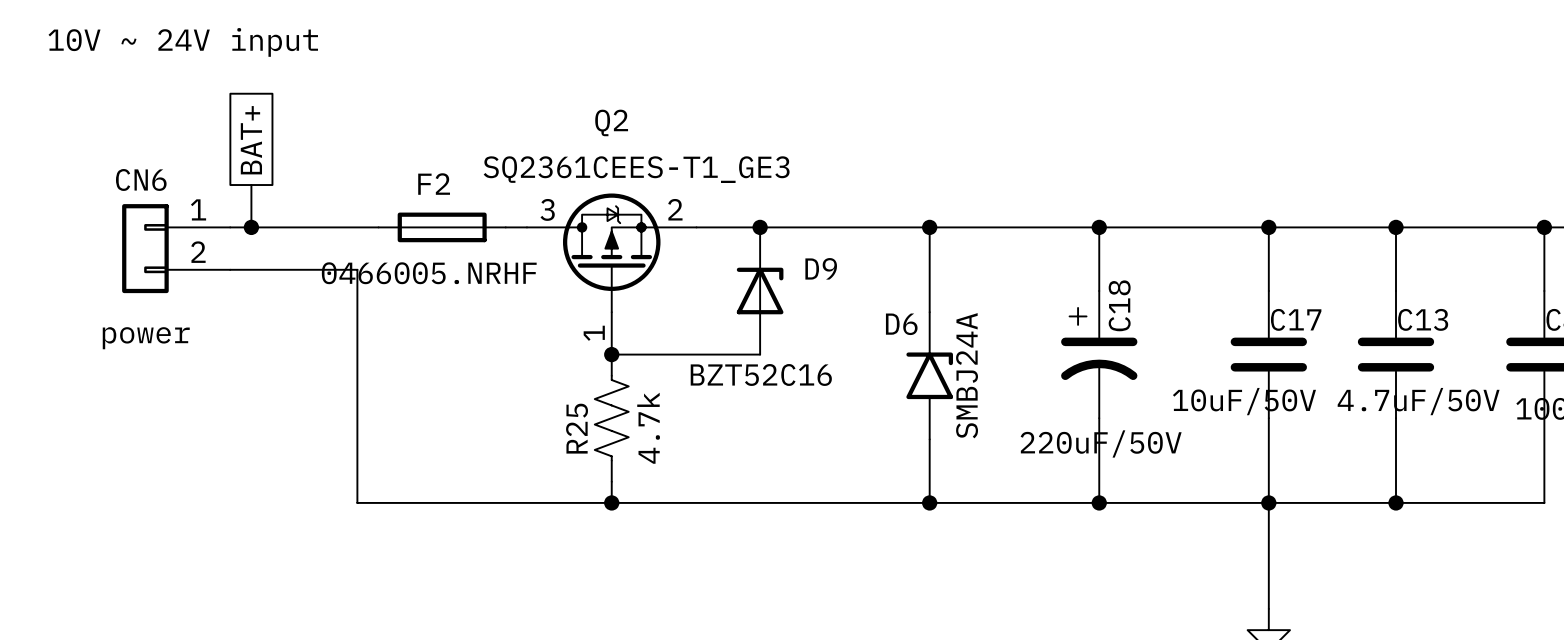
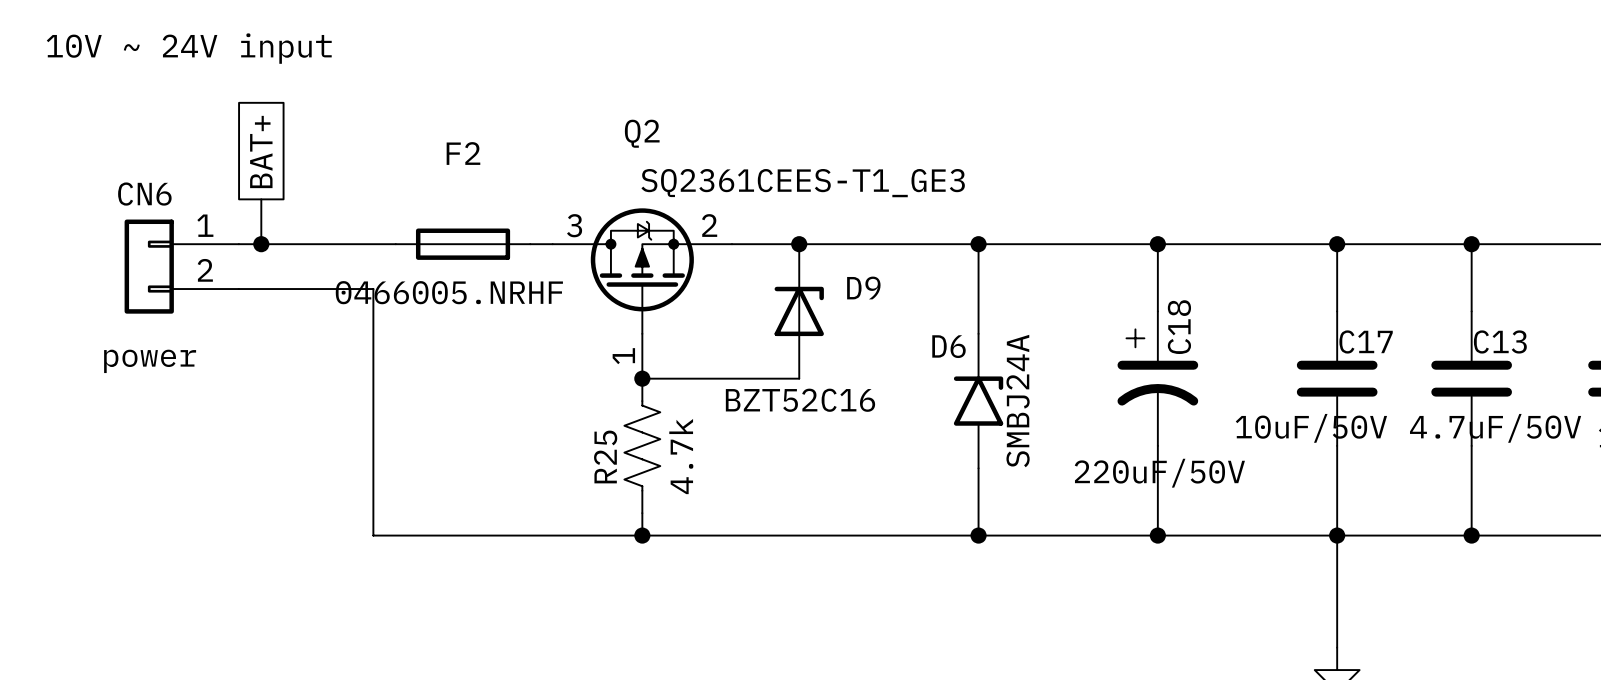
Q2 value position: SQ2361CEES-T1_GE3 (636, 169) -> SQ2361CEES-T1_GE3 (803, 183)
F2 name position: F2 (434, 184) -> F2 (463, 153)

